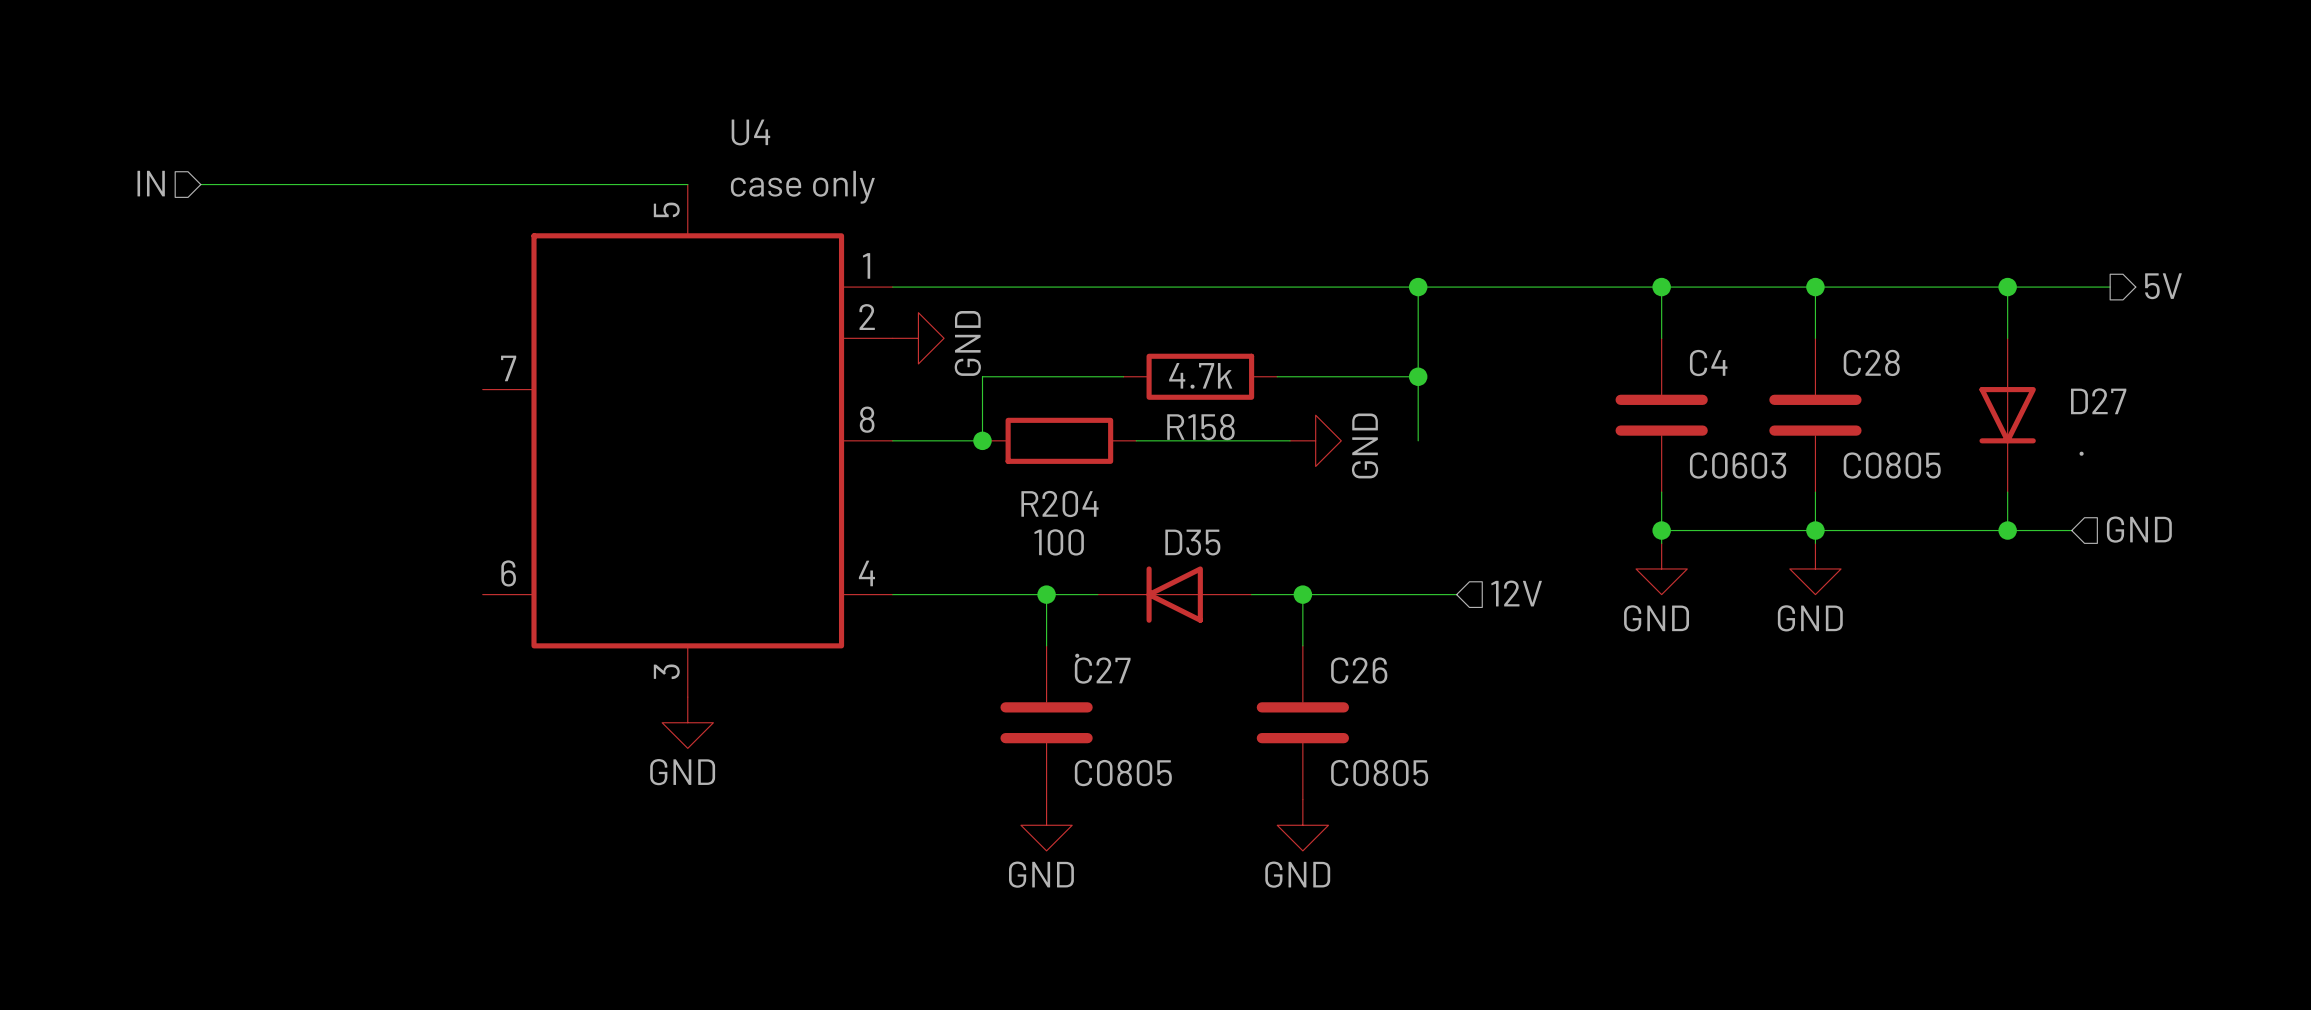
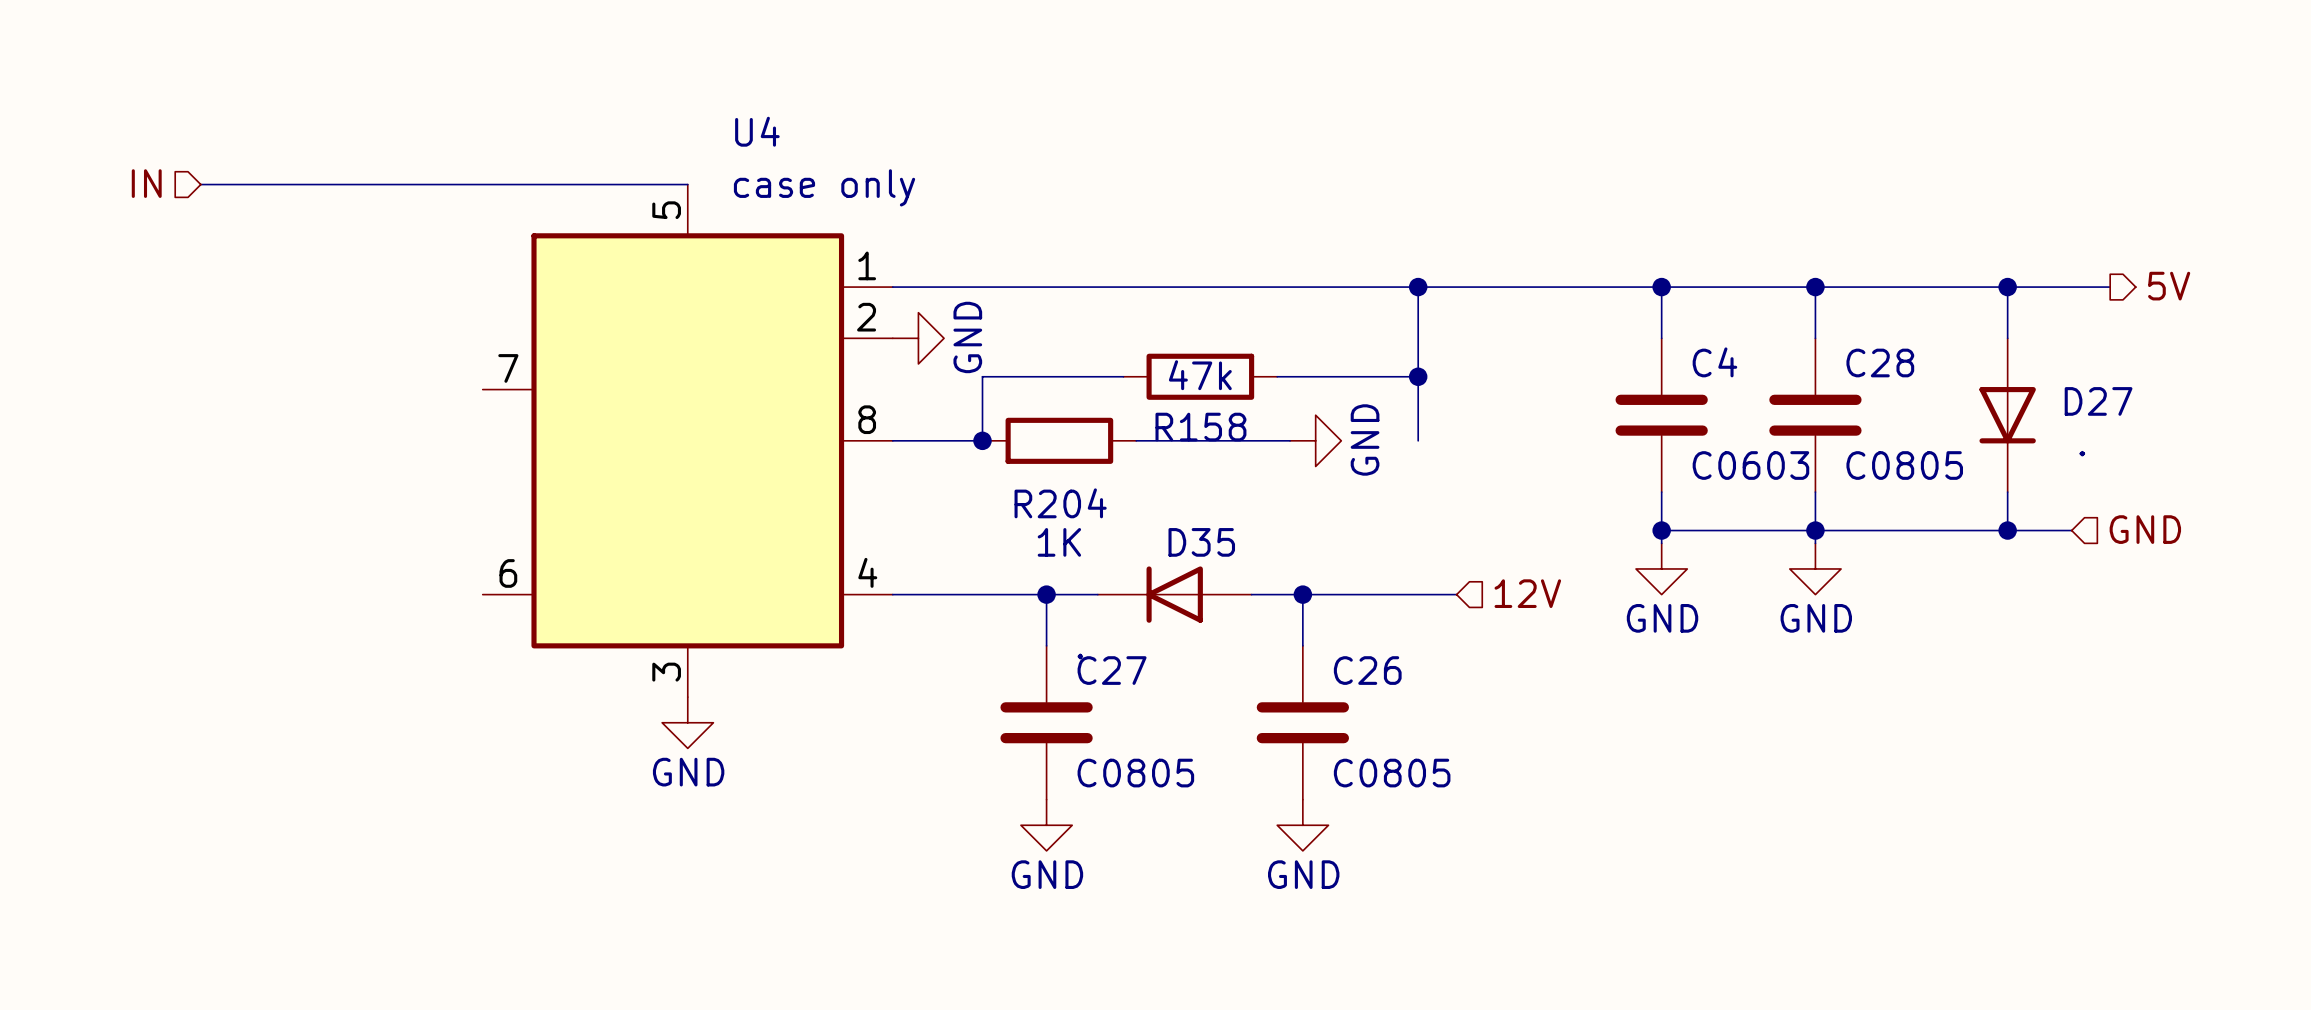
R158 value: 4.7k (1200, 375) -> 47k (1200, 375)
R204 value: 100 (1059, 542) -> 1K (1059, 542)

